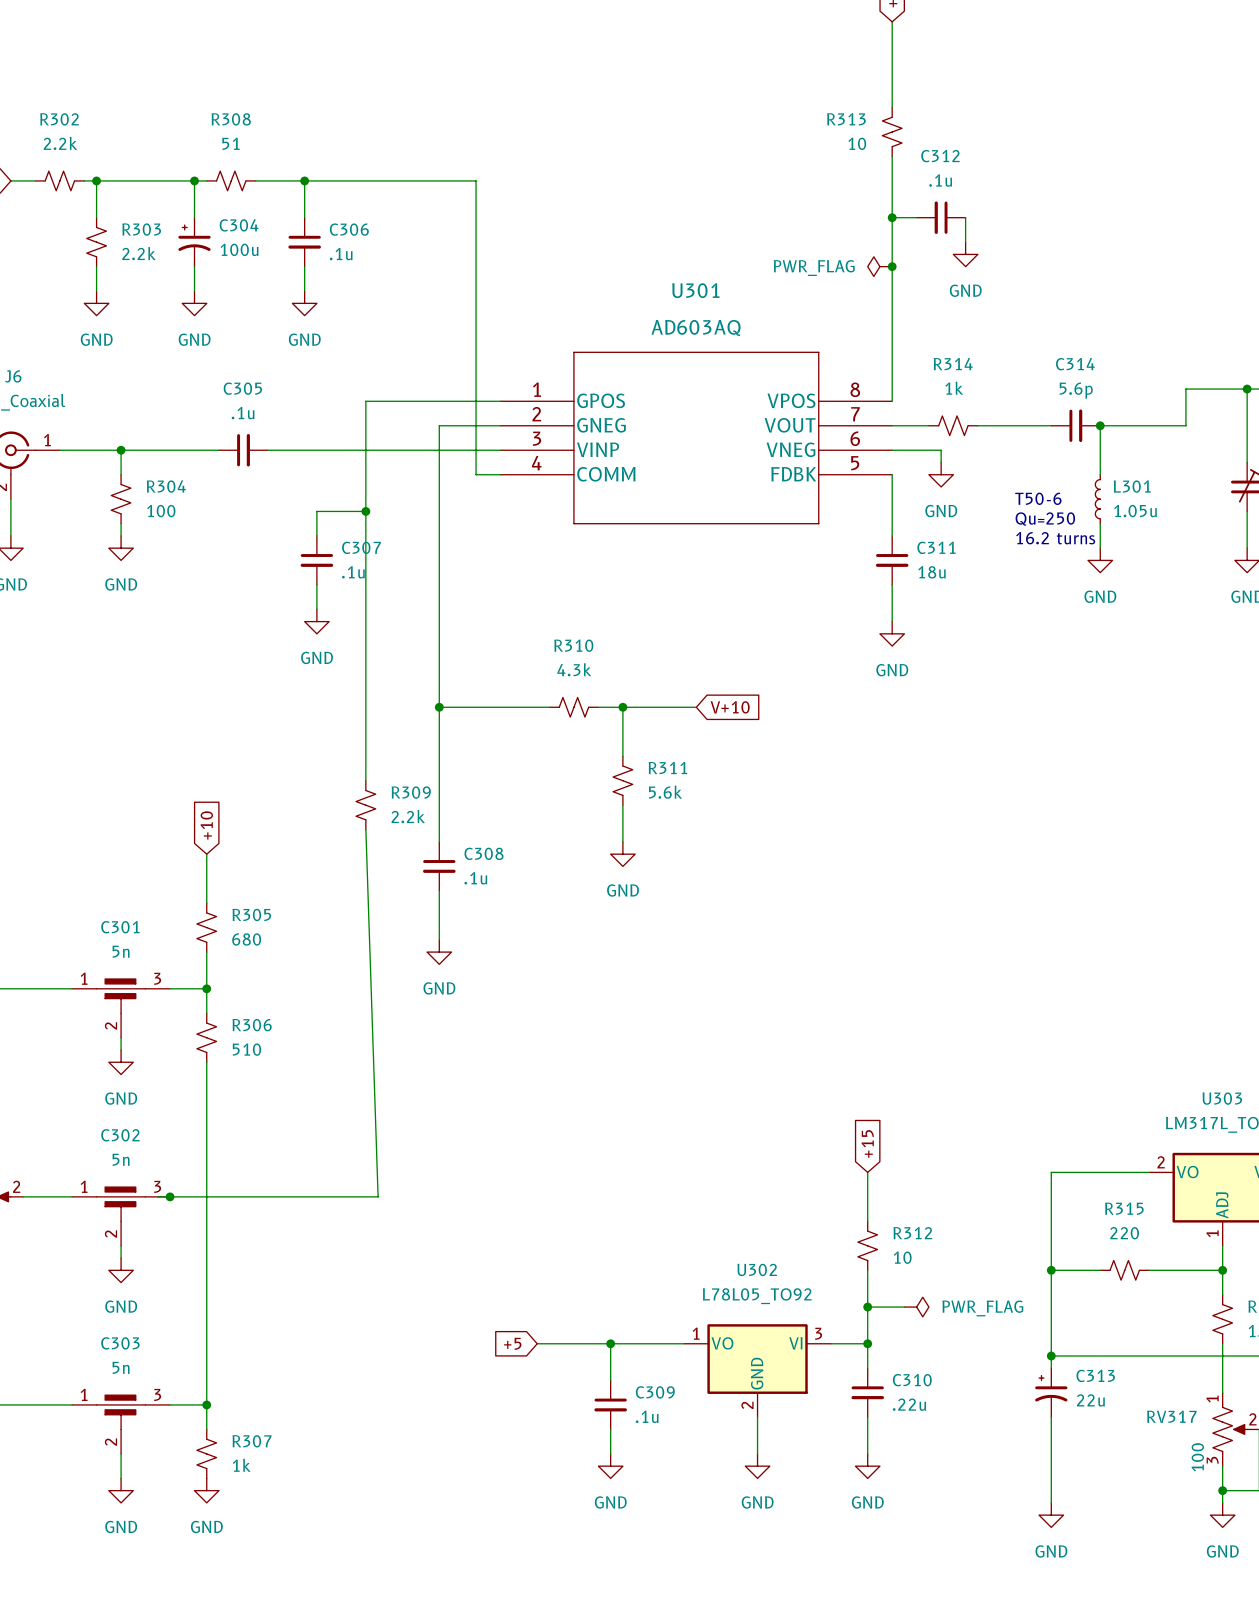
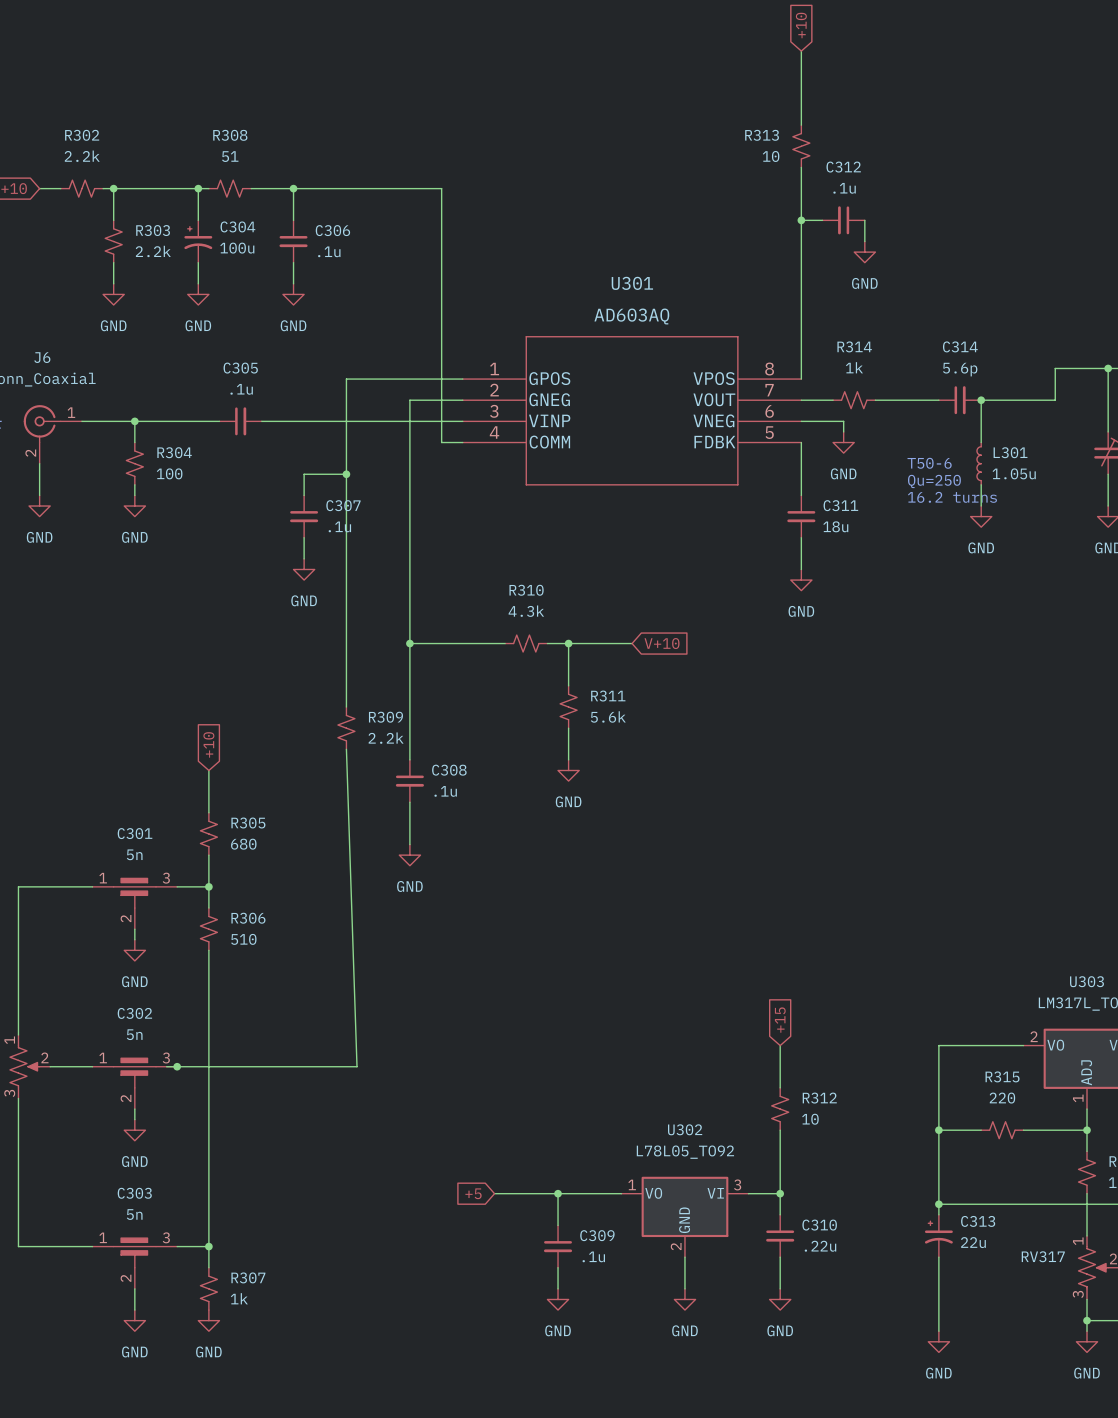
power symbol: PWR_FLAG (879, 266) -> none
junction: (892, 266) -> none
wire: (867, 1307) (904, 1307) -> none
junction: (867, 1307) -> none
power symbol: PWR_FLAG (916, 1307) -> none
RV317 value: 100 (1197, 1457) -> none

